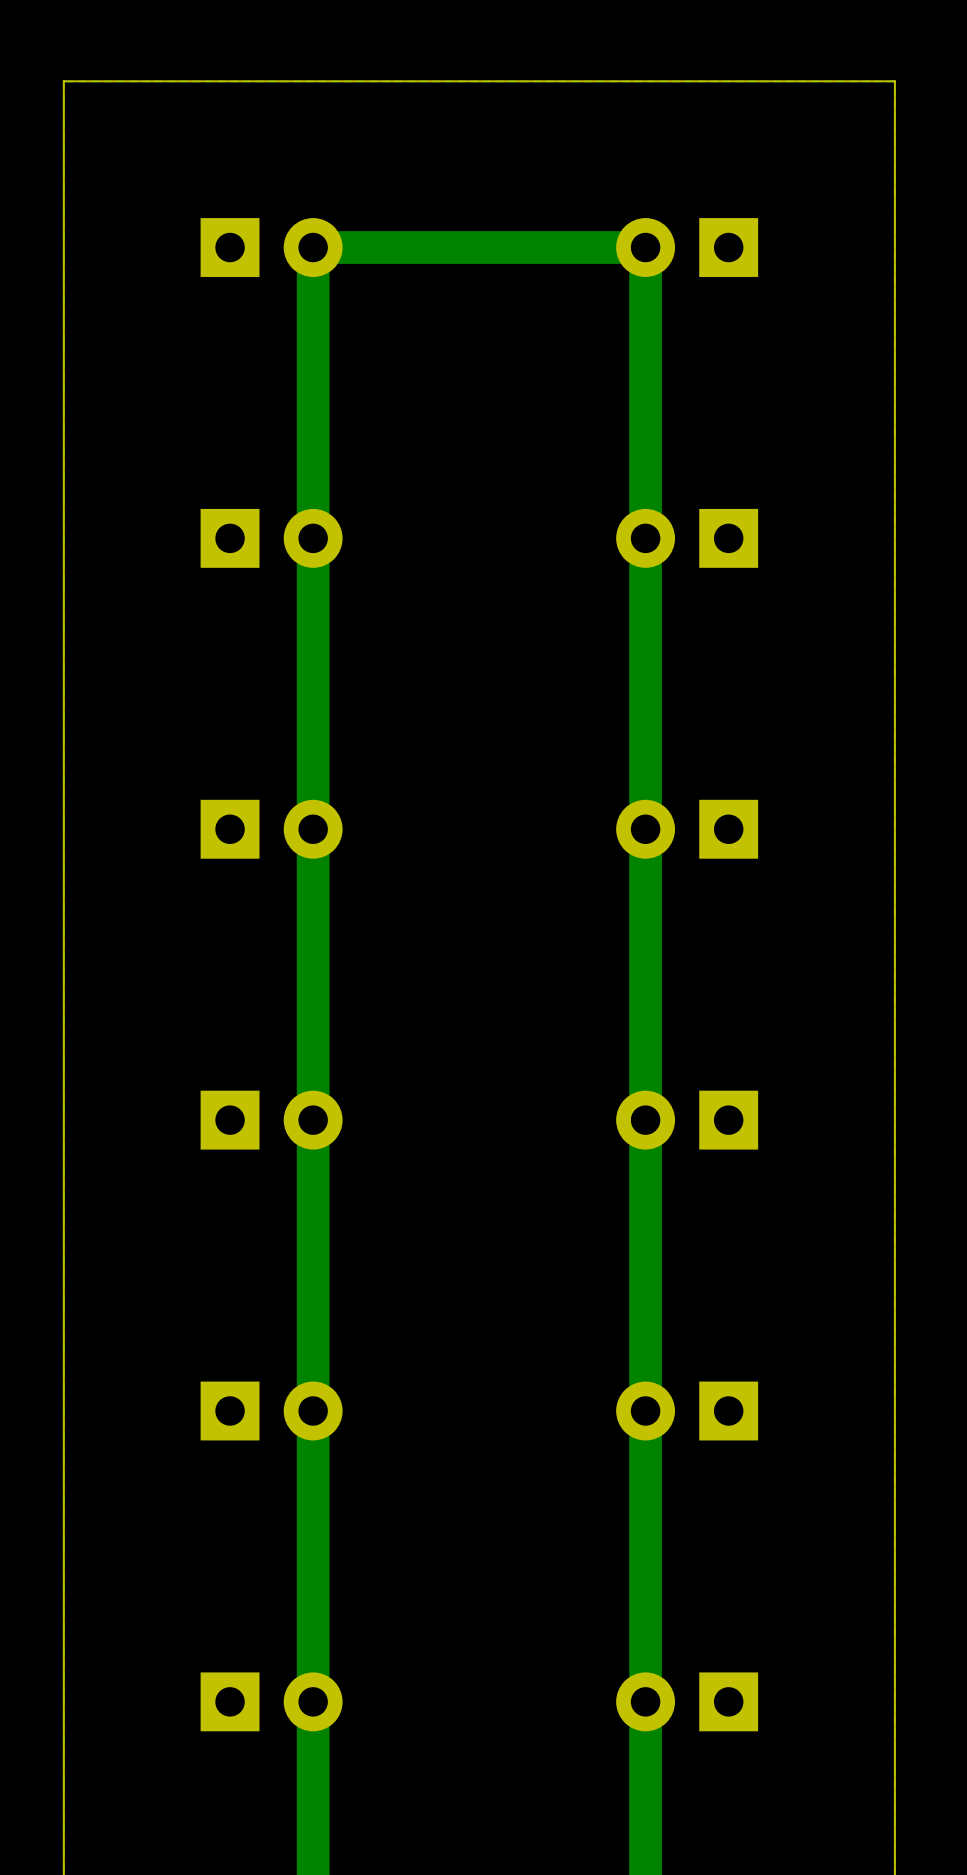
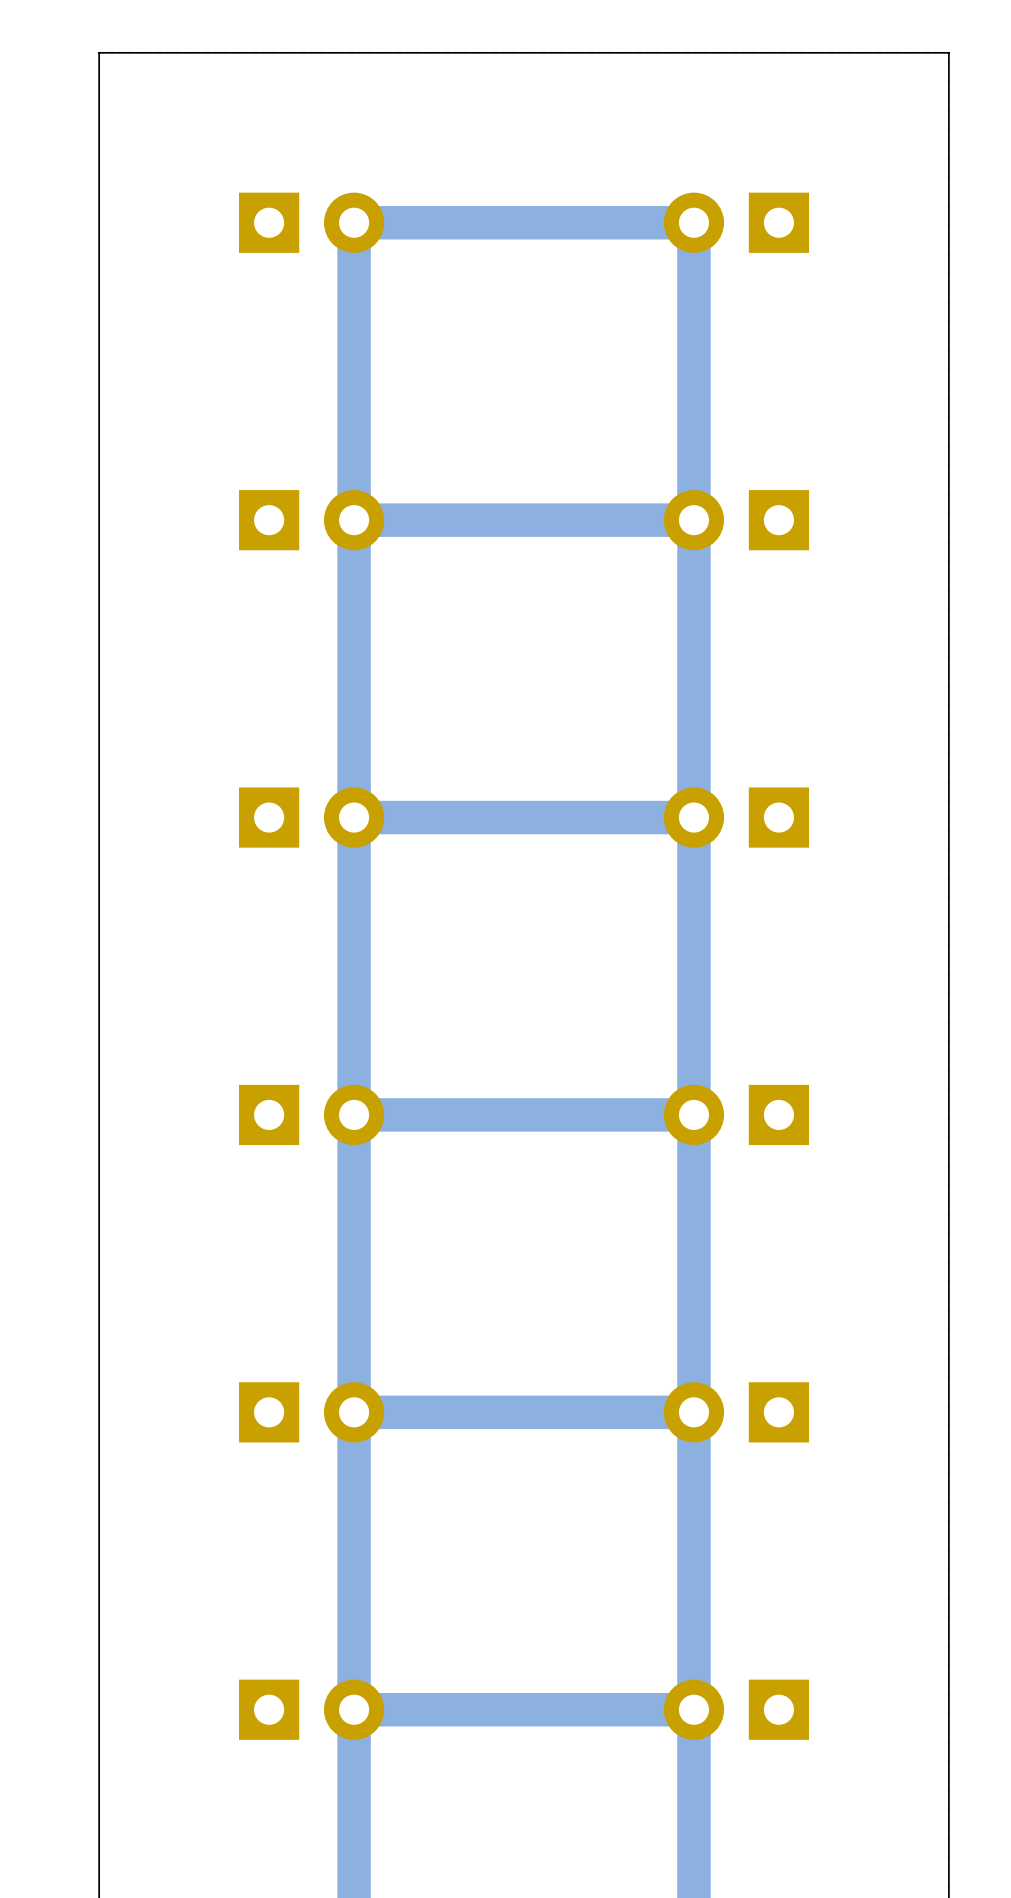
bottom track: none -> (693, 520) (354, 520)
bottom track: none -> (693, 817) (354, 817)
bottom track: none -> (693, 1114) (354, 1114)
bottom track: none -> (693, 1412) (354, 1412)
bottom track: none -> (693, 1709) (354, 1709)

